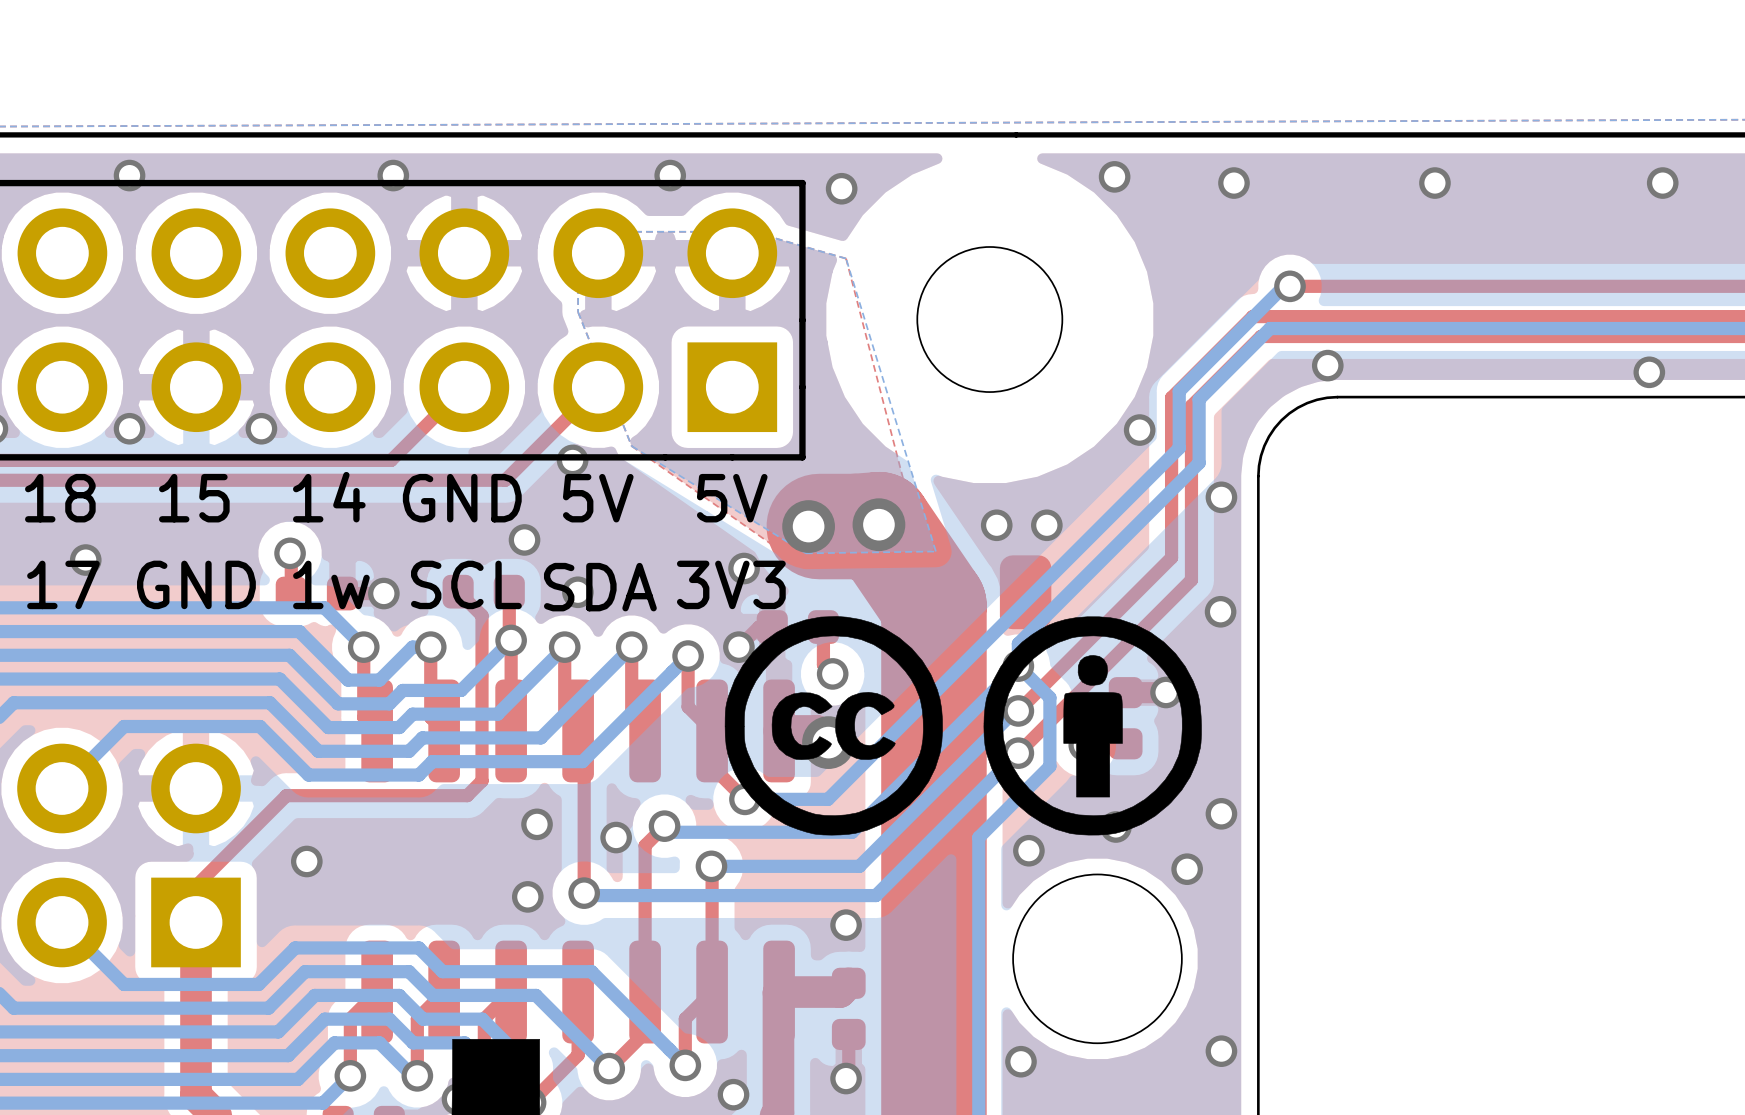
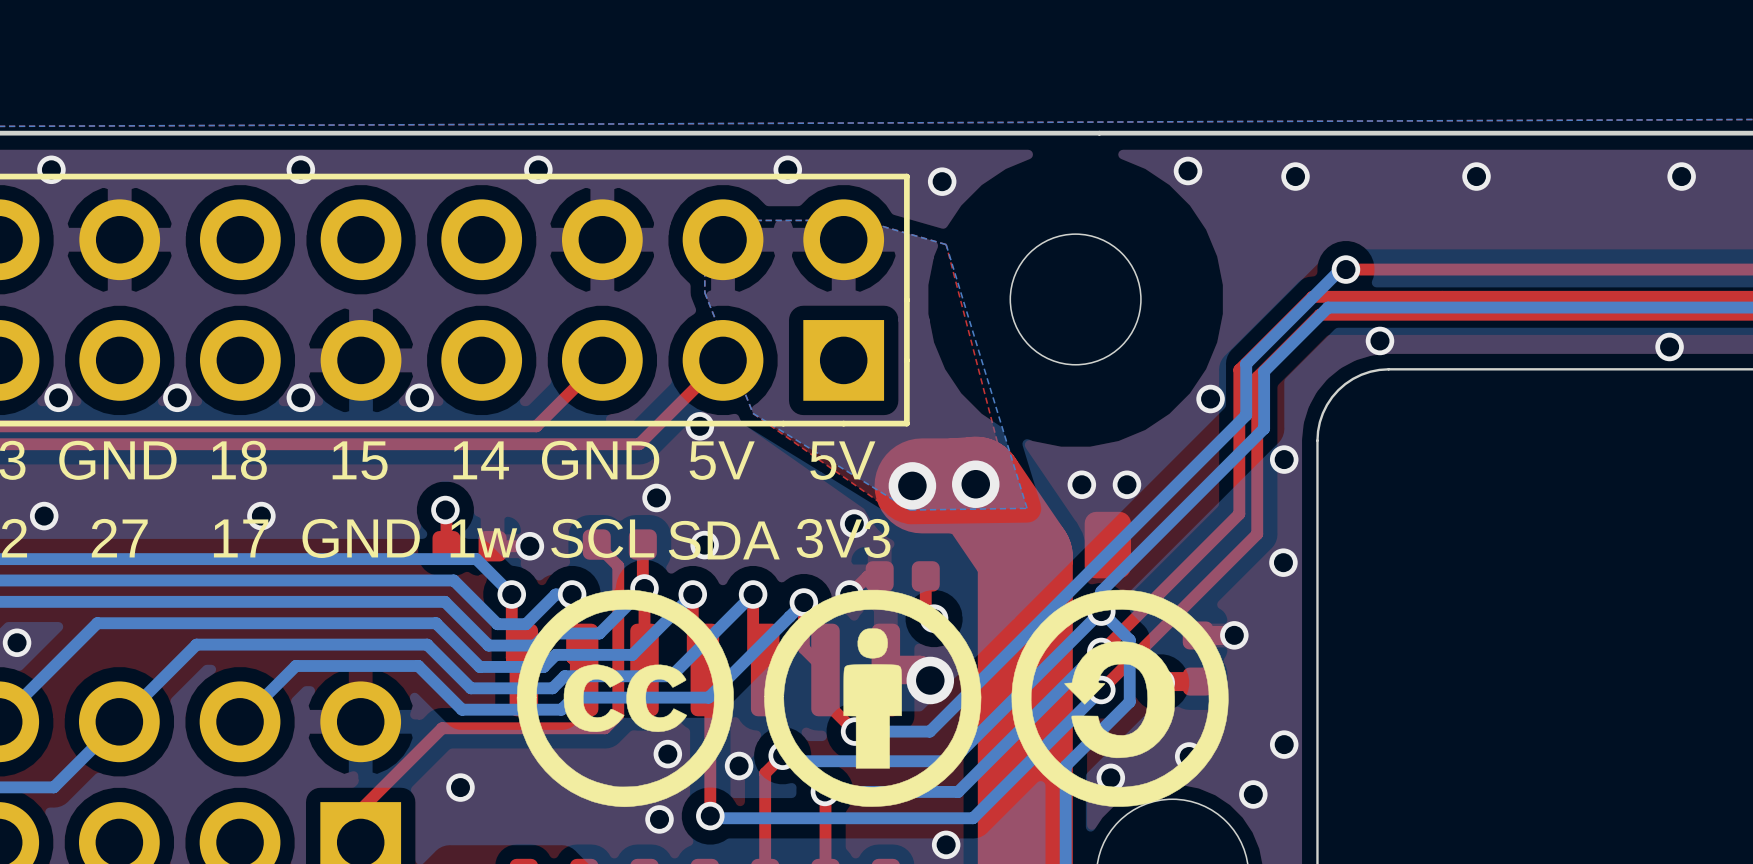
drawing: [724, 616, 1202, 836] -> none
drawing: none -> [516, 589, 1229, 808]

